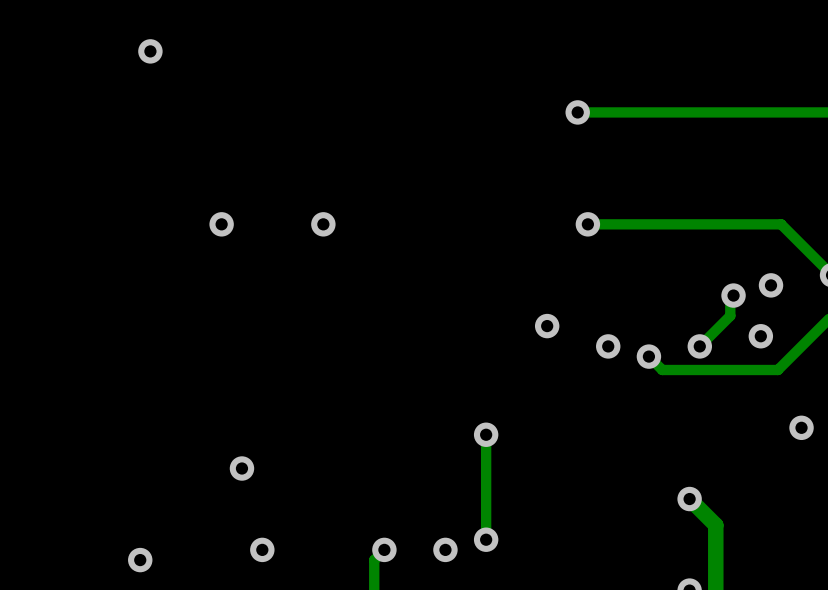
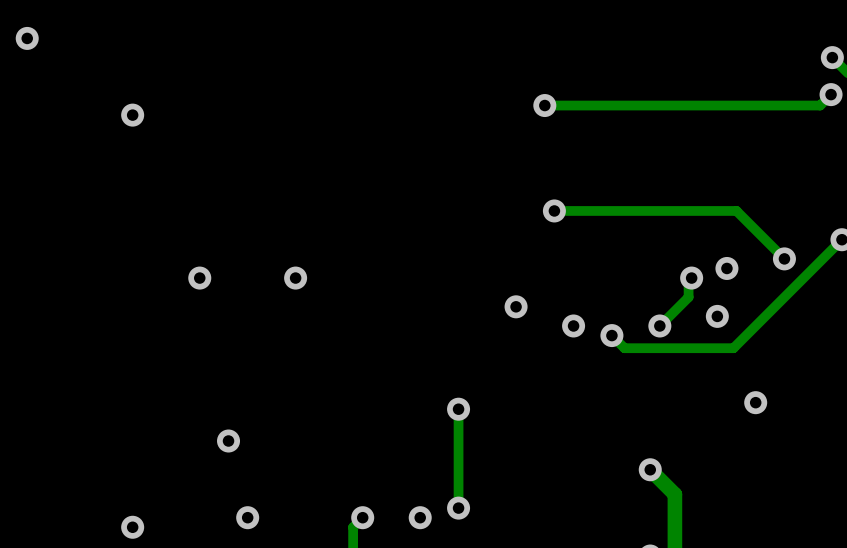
via: none -> (27, 38)
via: (150, 51) -> none
via: none -> (132, 115)
via: (221, 224) -> none
via: (323, 224) -> none
via: none -> (199, 278)
via: none -> (295, 278)

